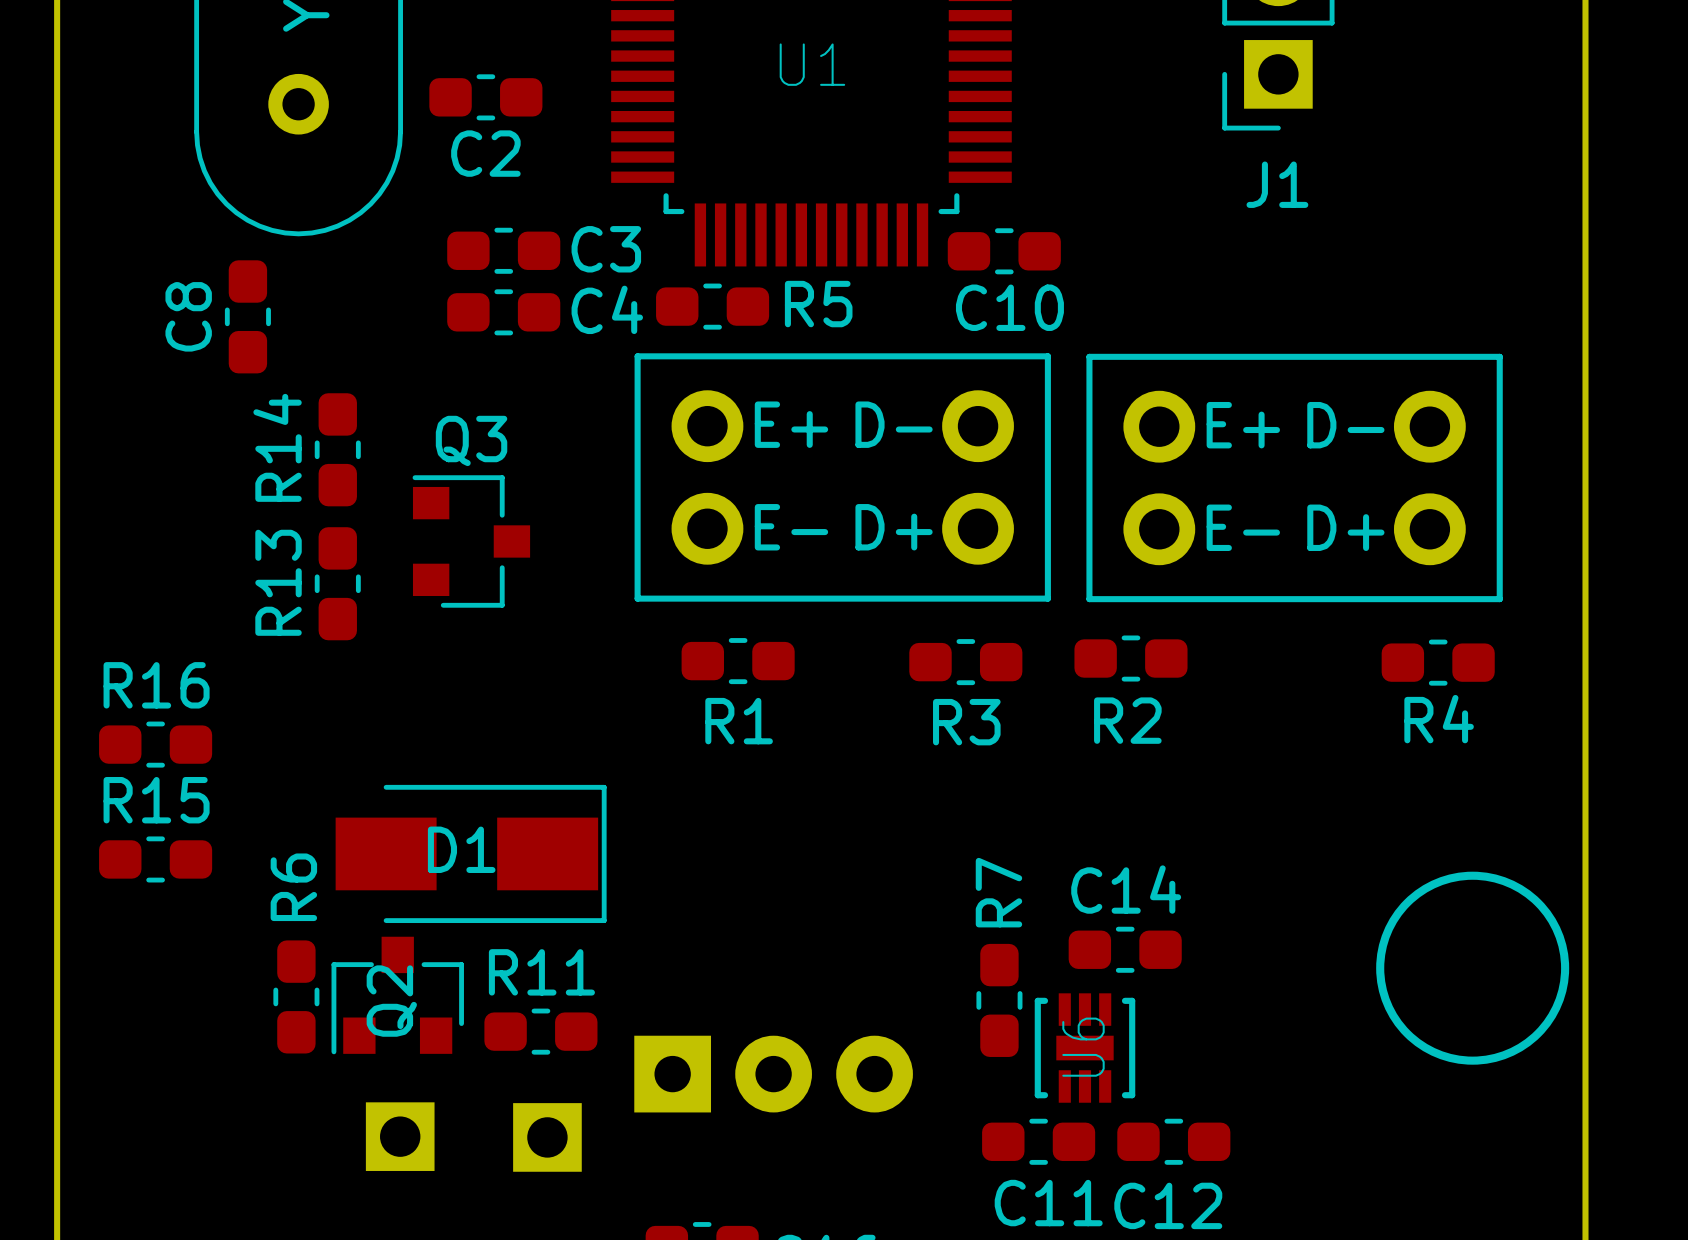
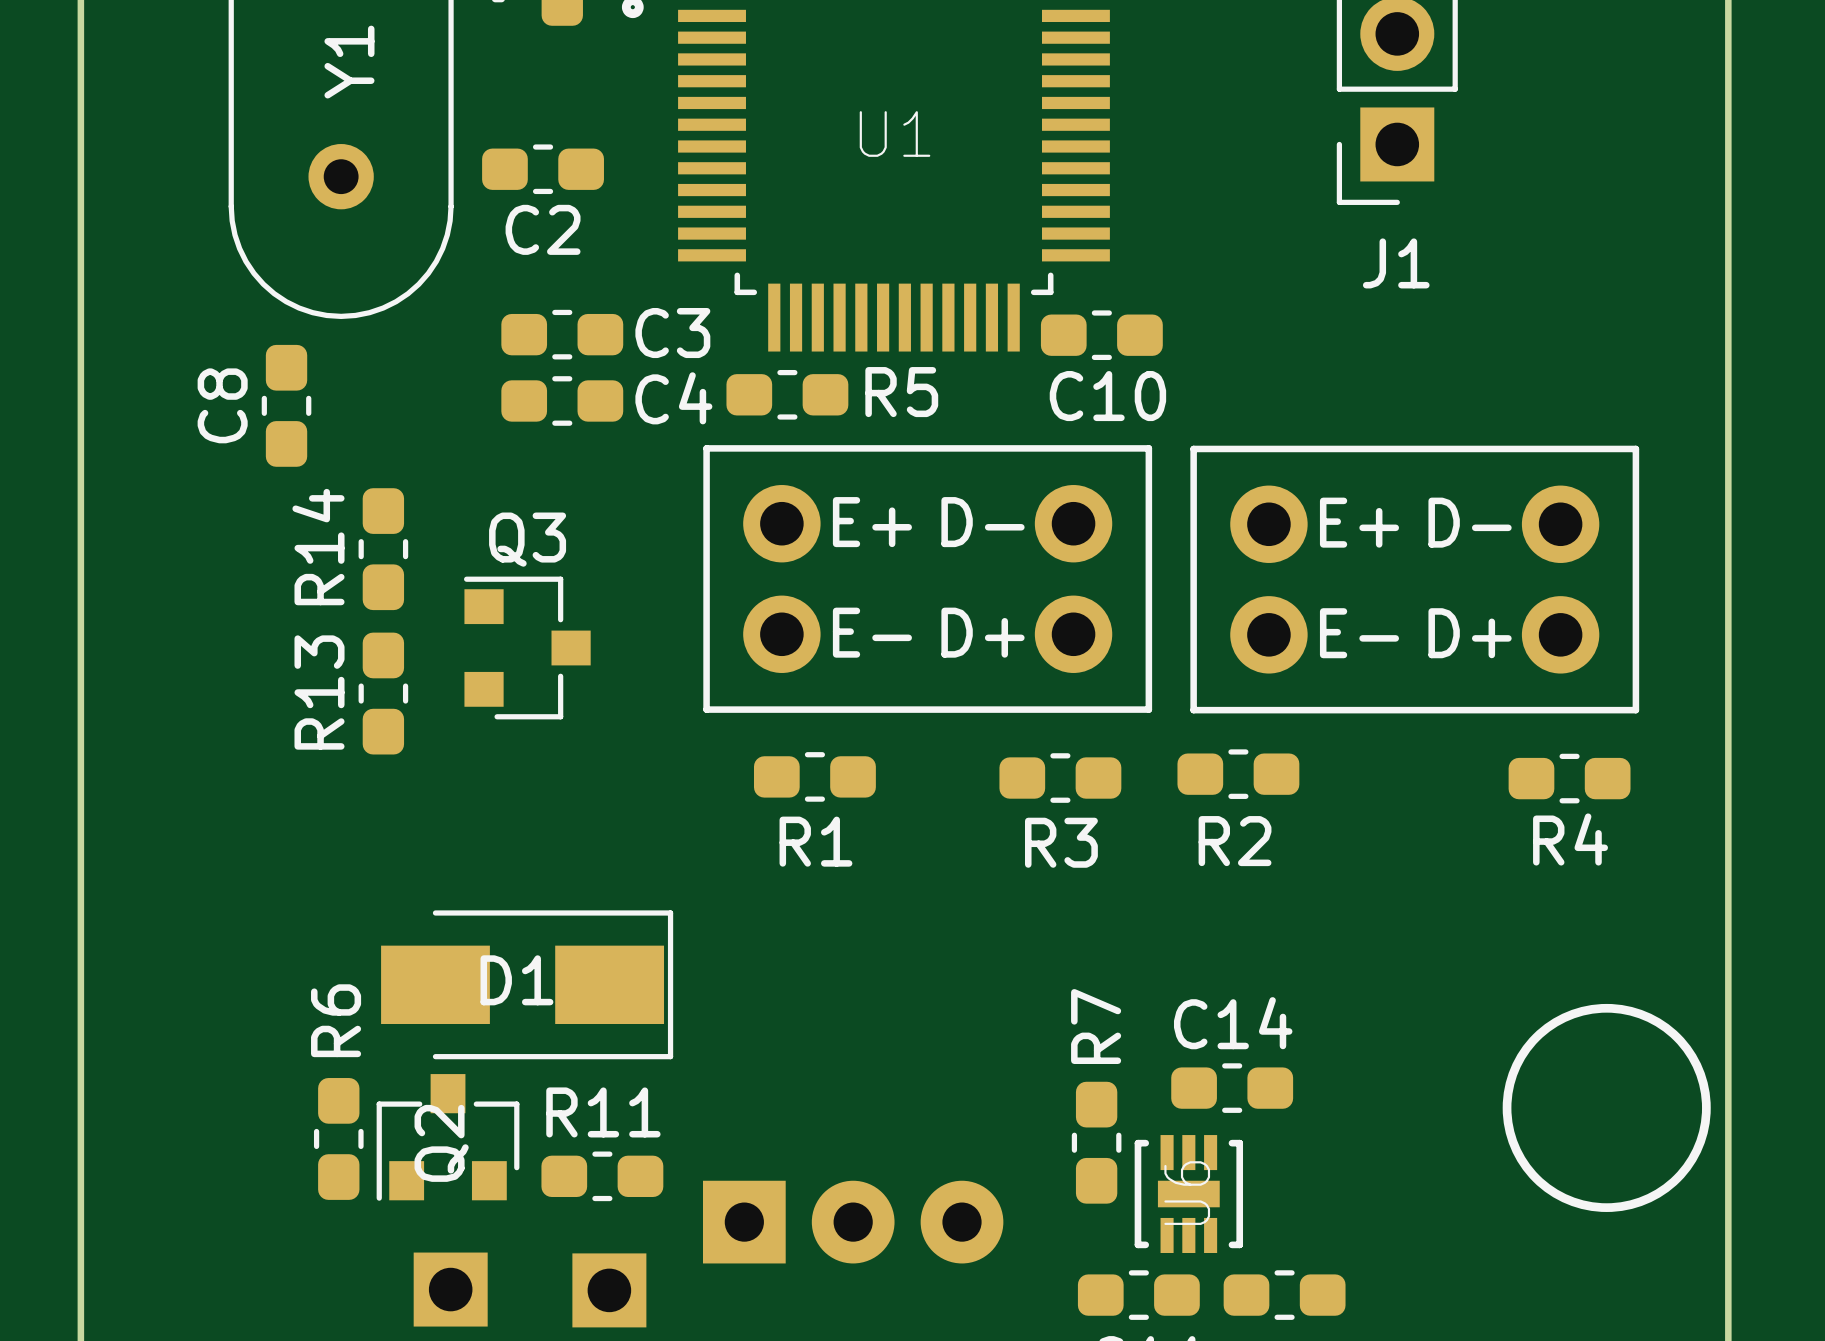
R16: (155, 744) -> none
R15: (155, 859) -> none

